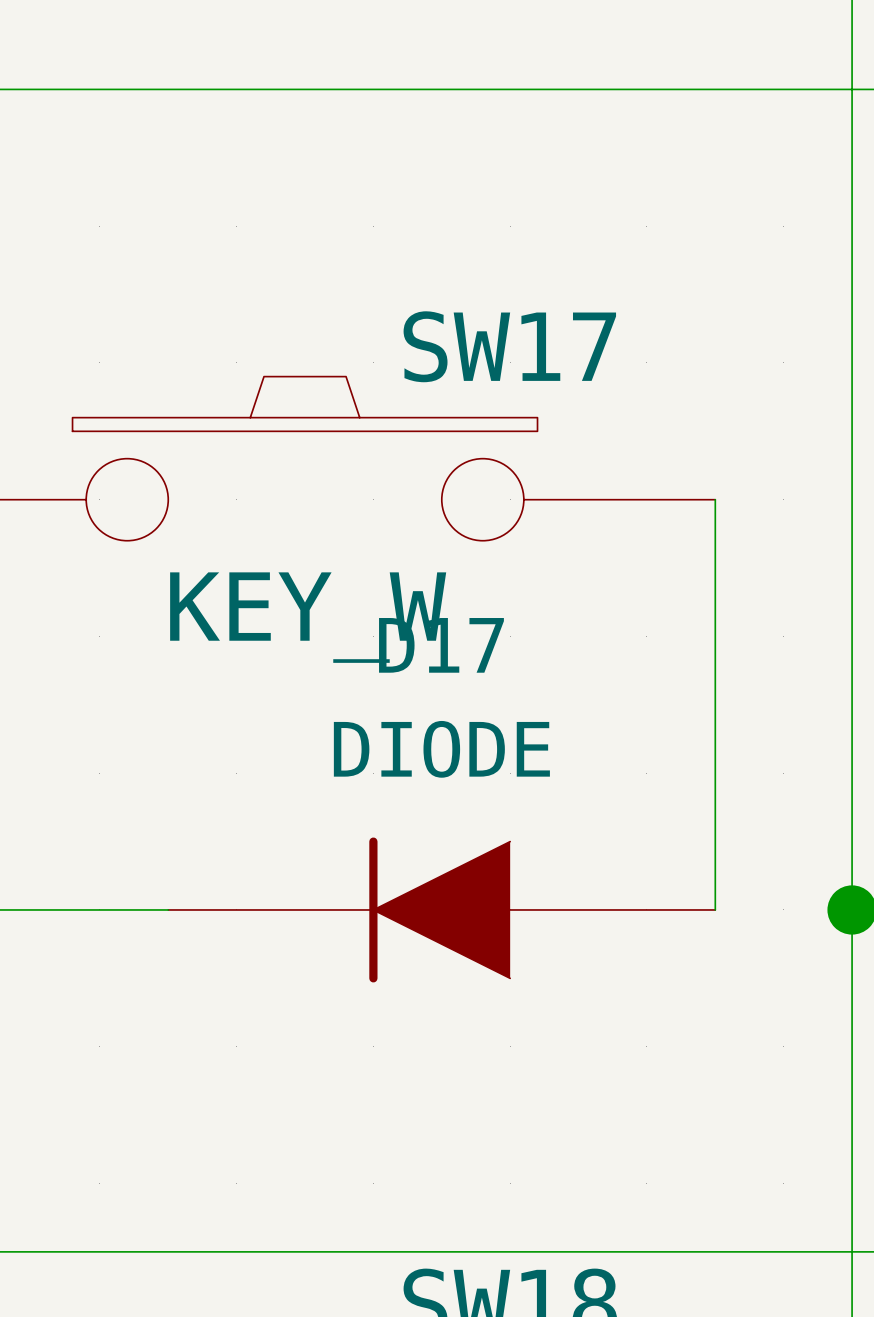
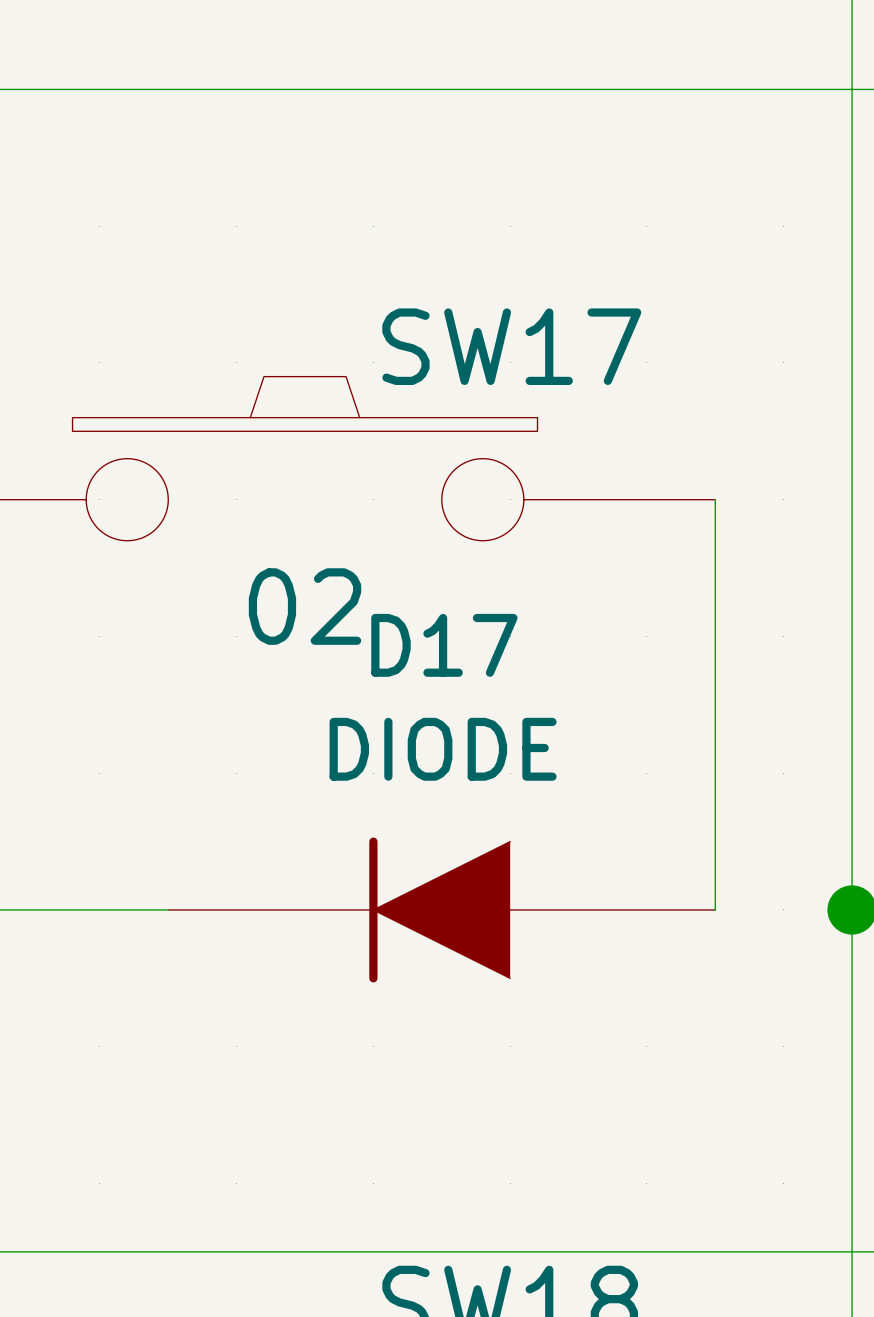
SW17 value: KEY_W (308, 617) -> 02 (305, 606)

